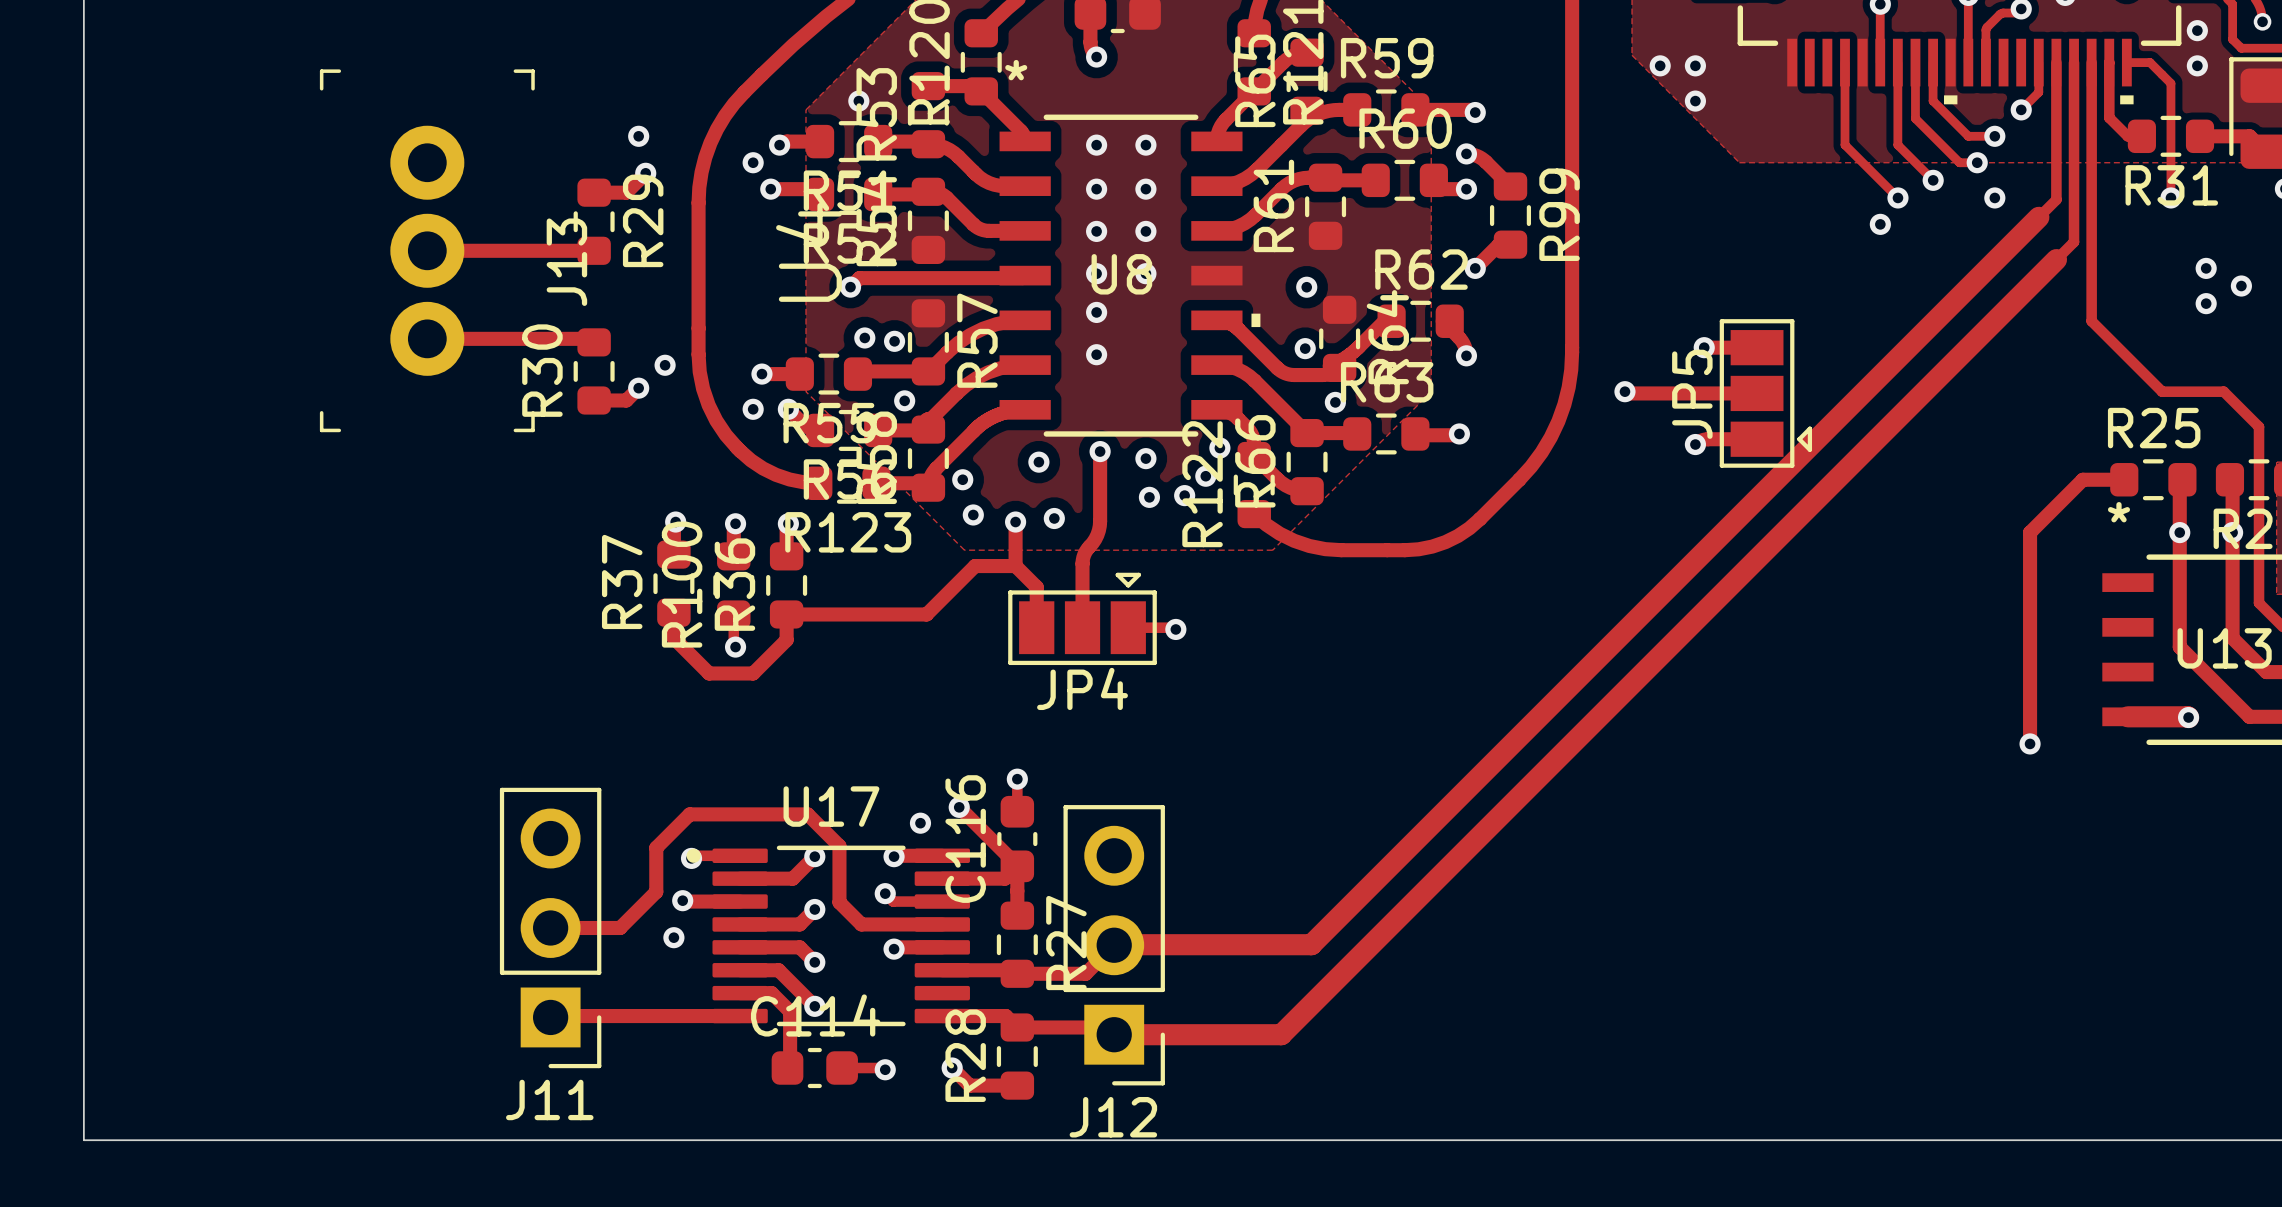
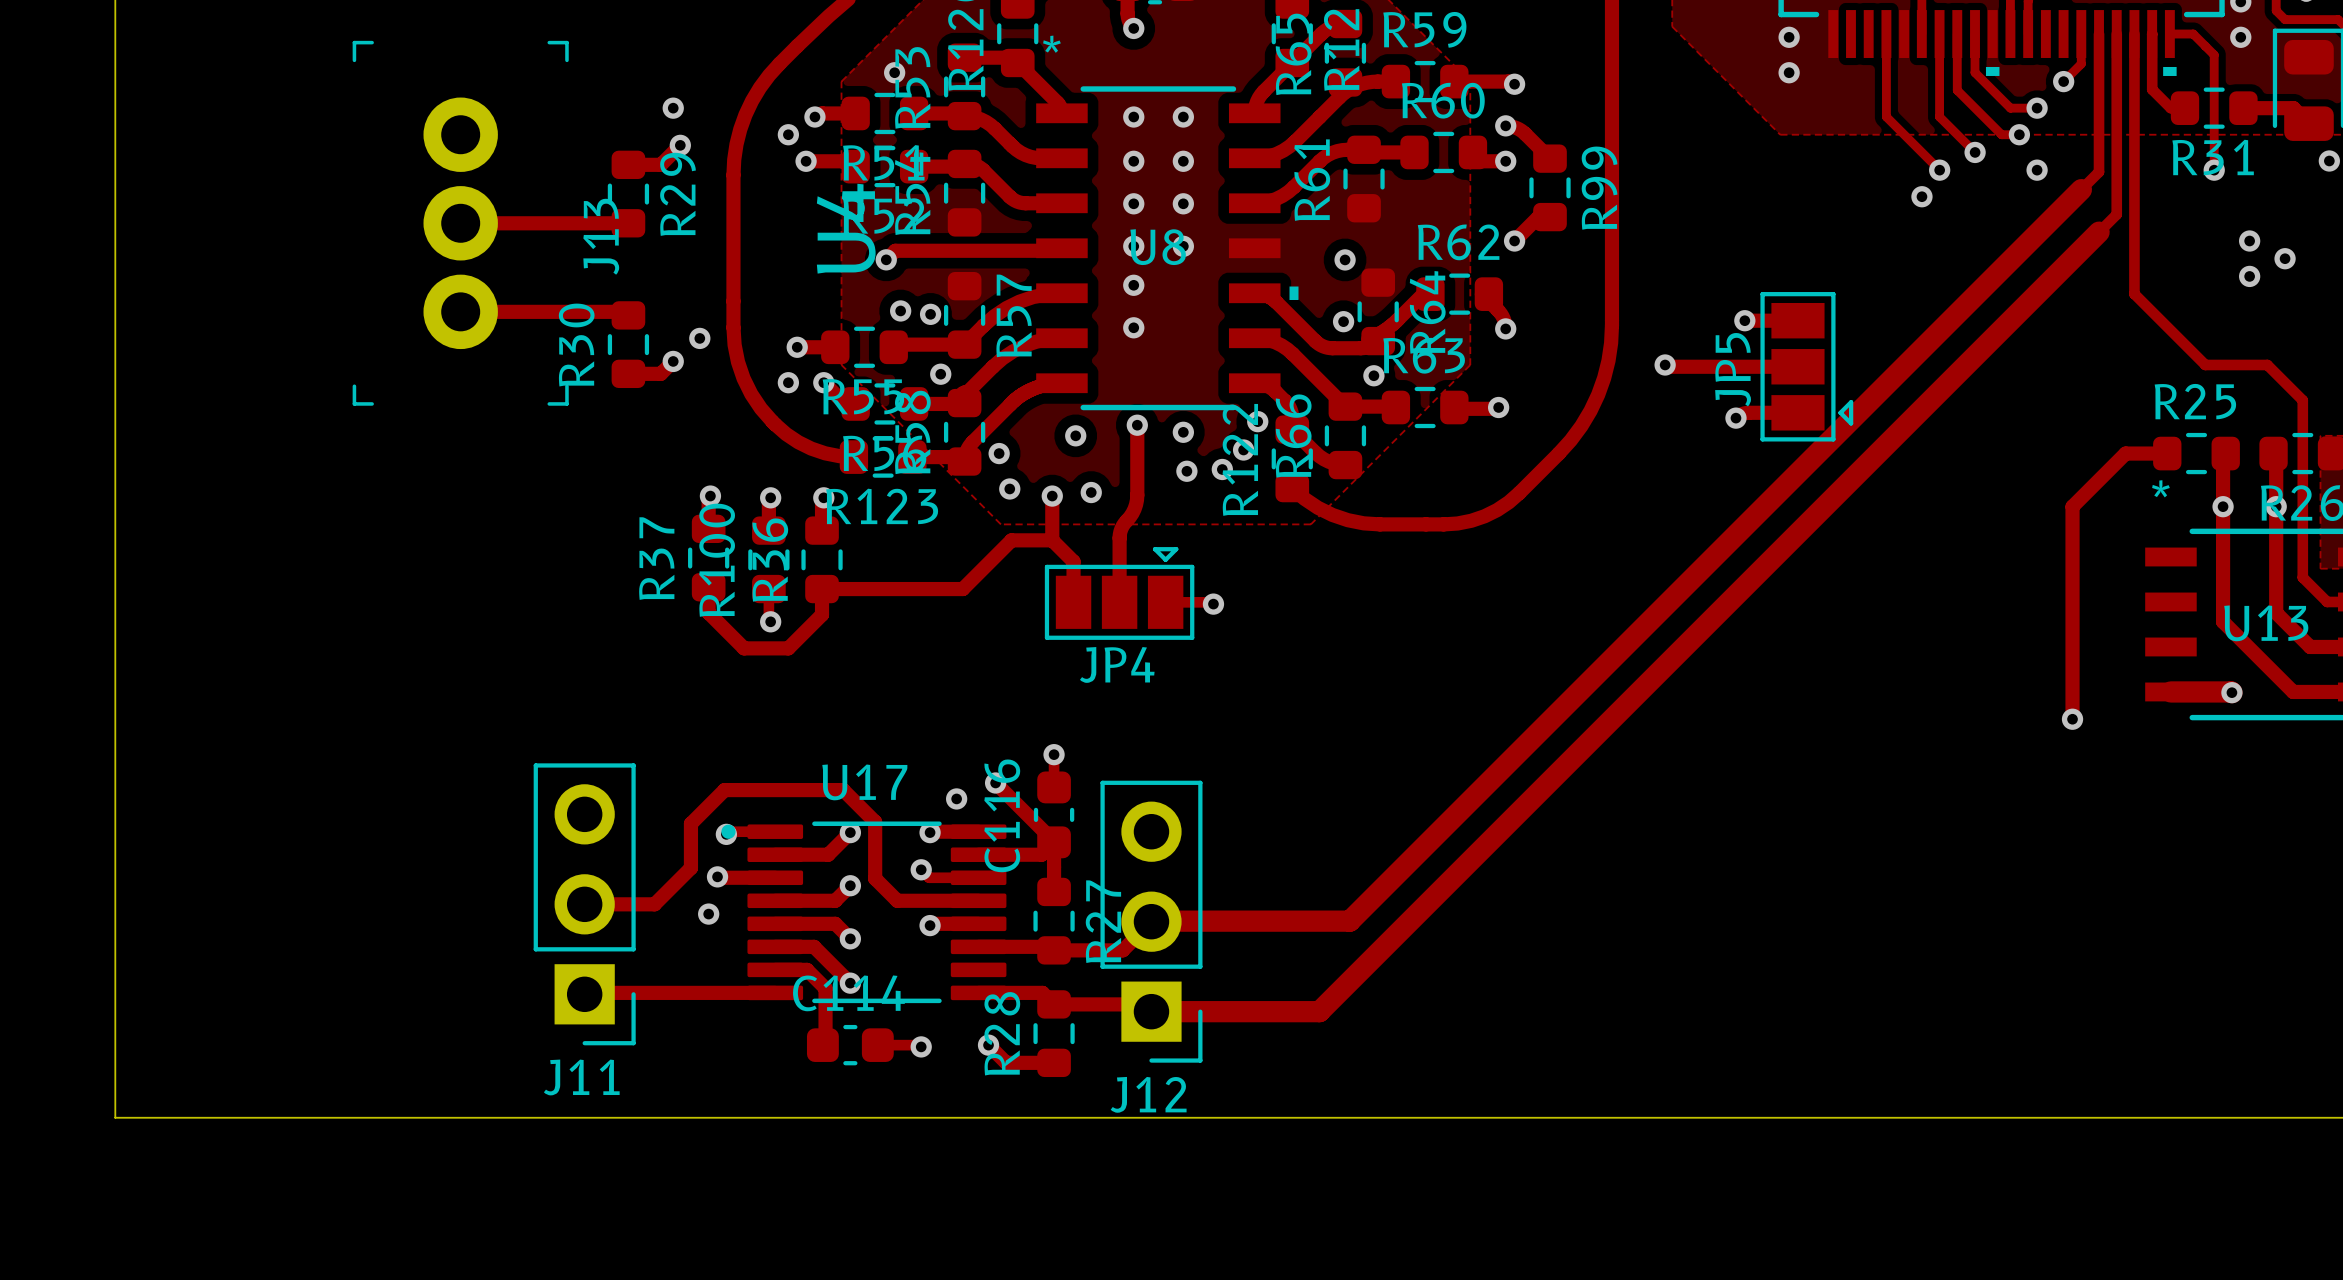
via: (1660, 65) -> none
via: (1695, 65) -> none
via: none -> (1789, 37)
via: (1695, 101) -> none
via: none -> (1789, 72)

